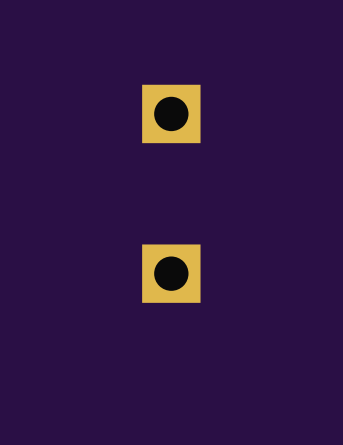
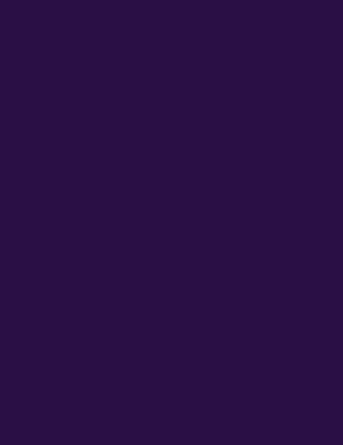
part: (171, 113) -> none
part: (171, 273) -> none

